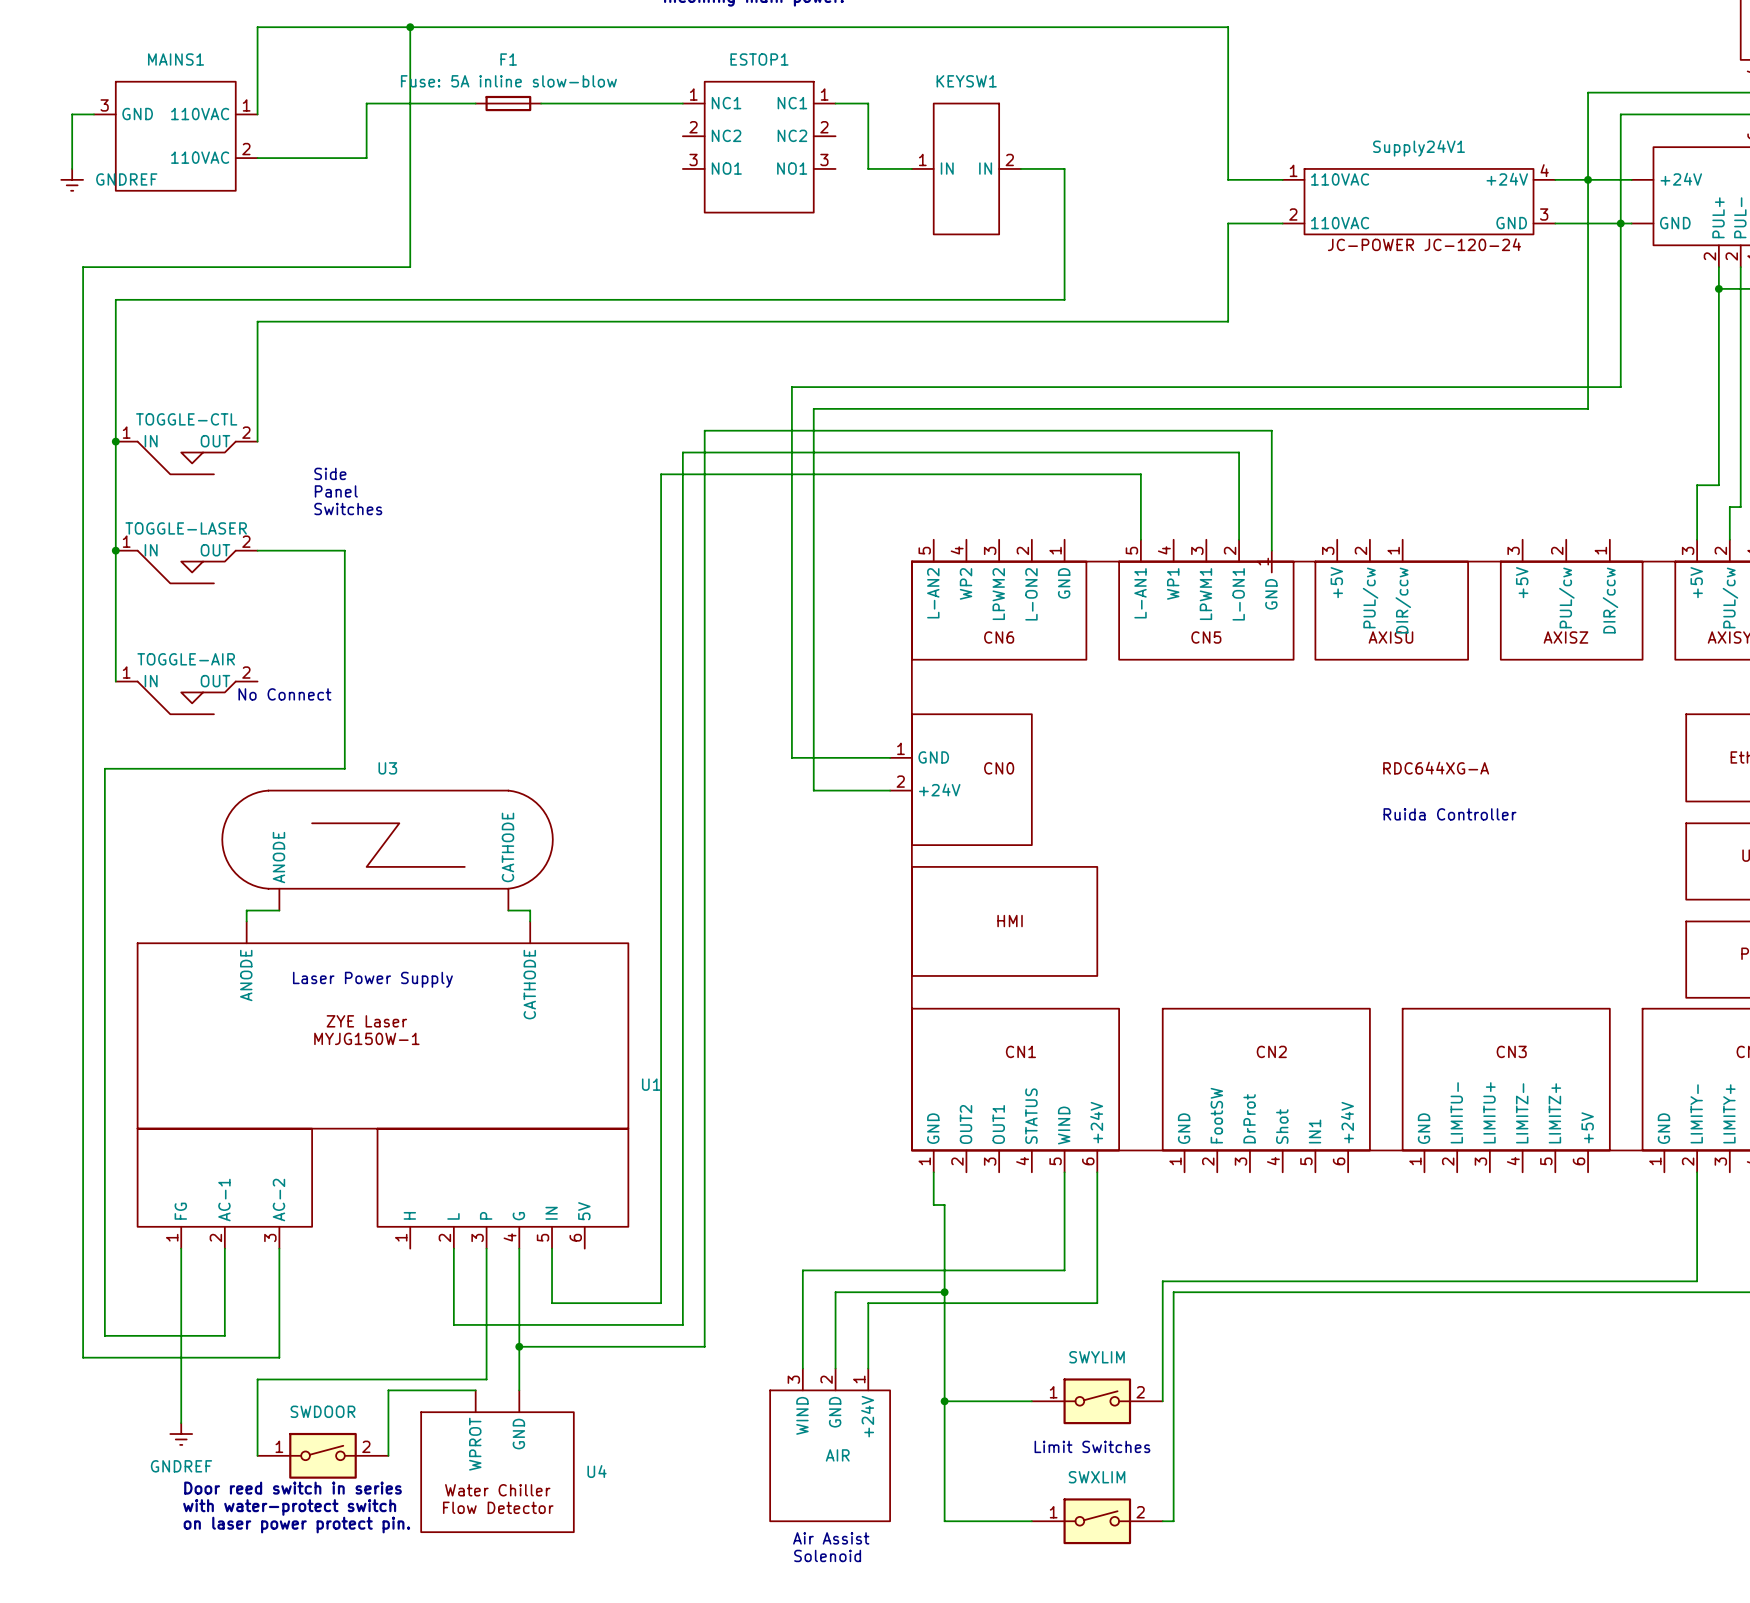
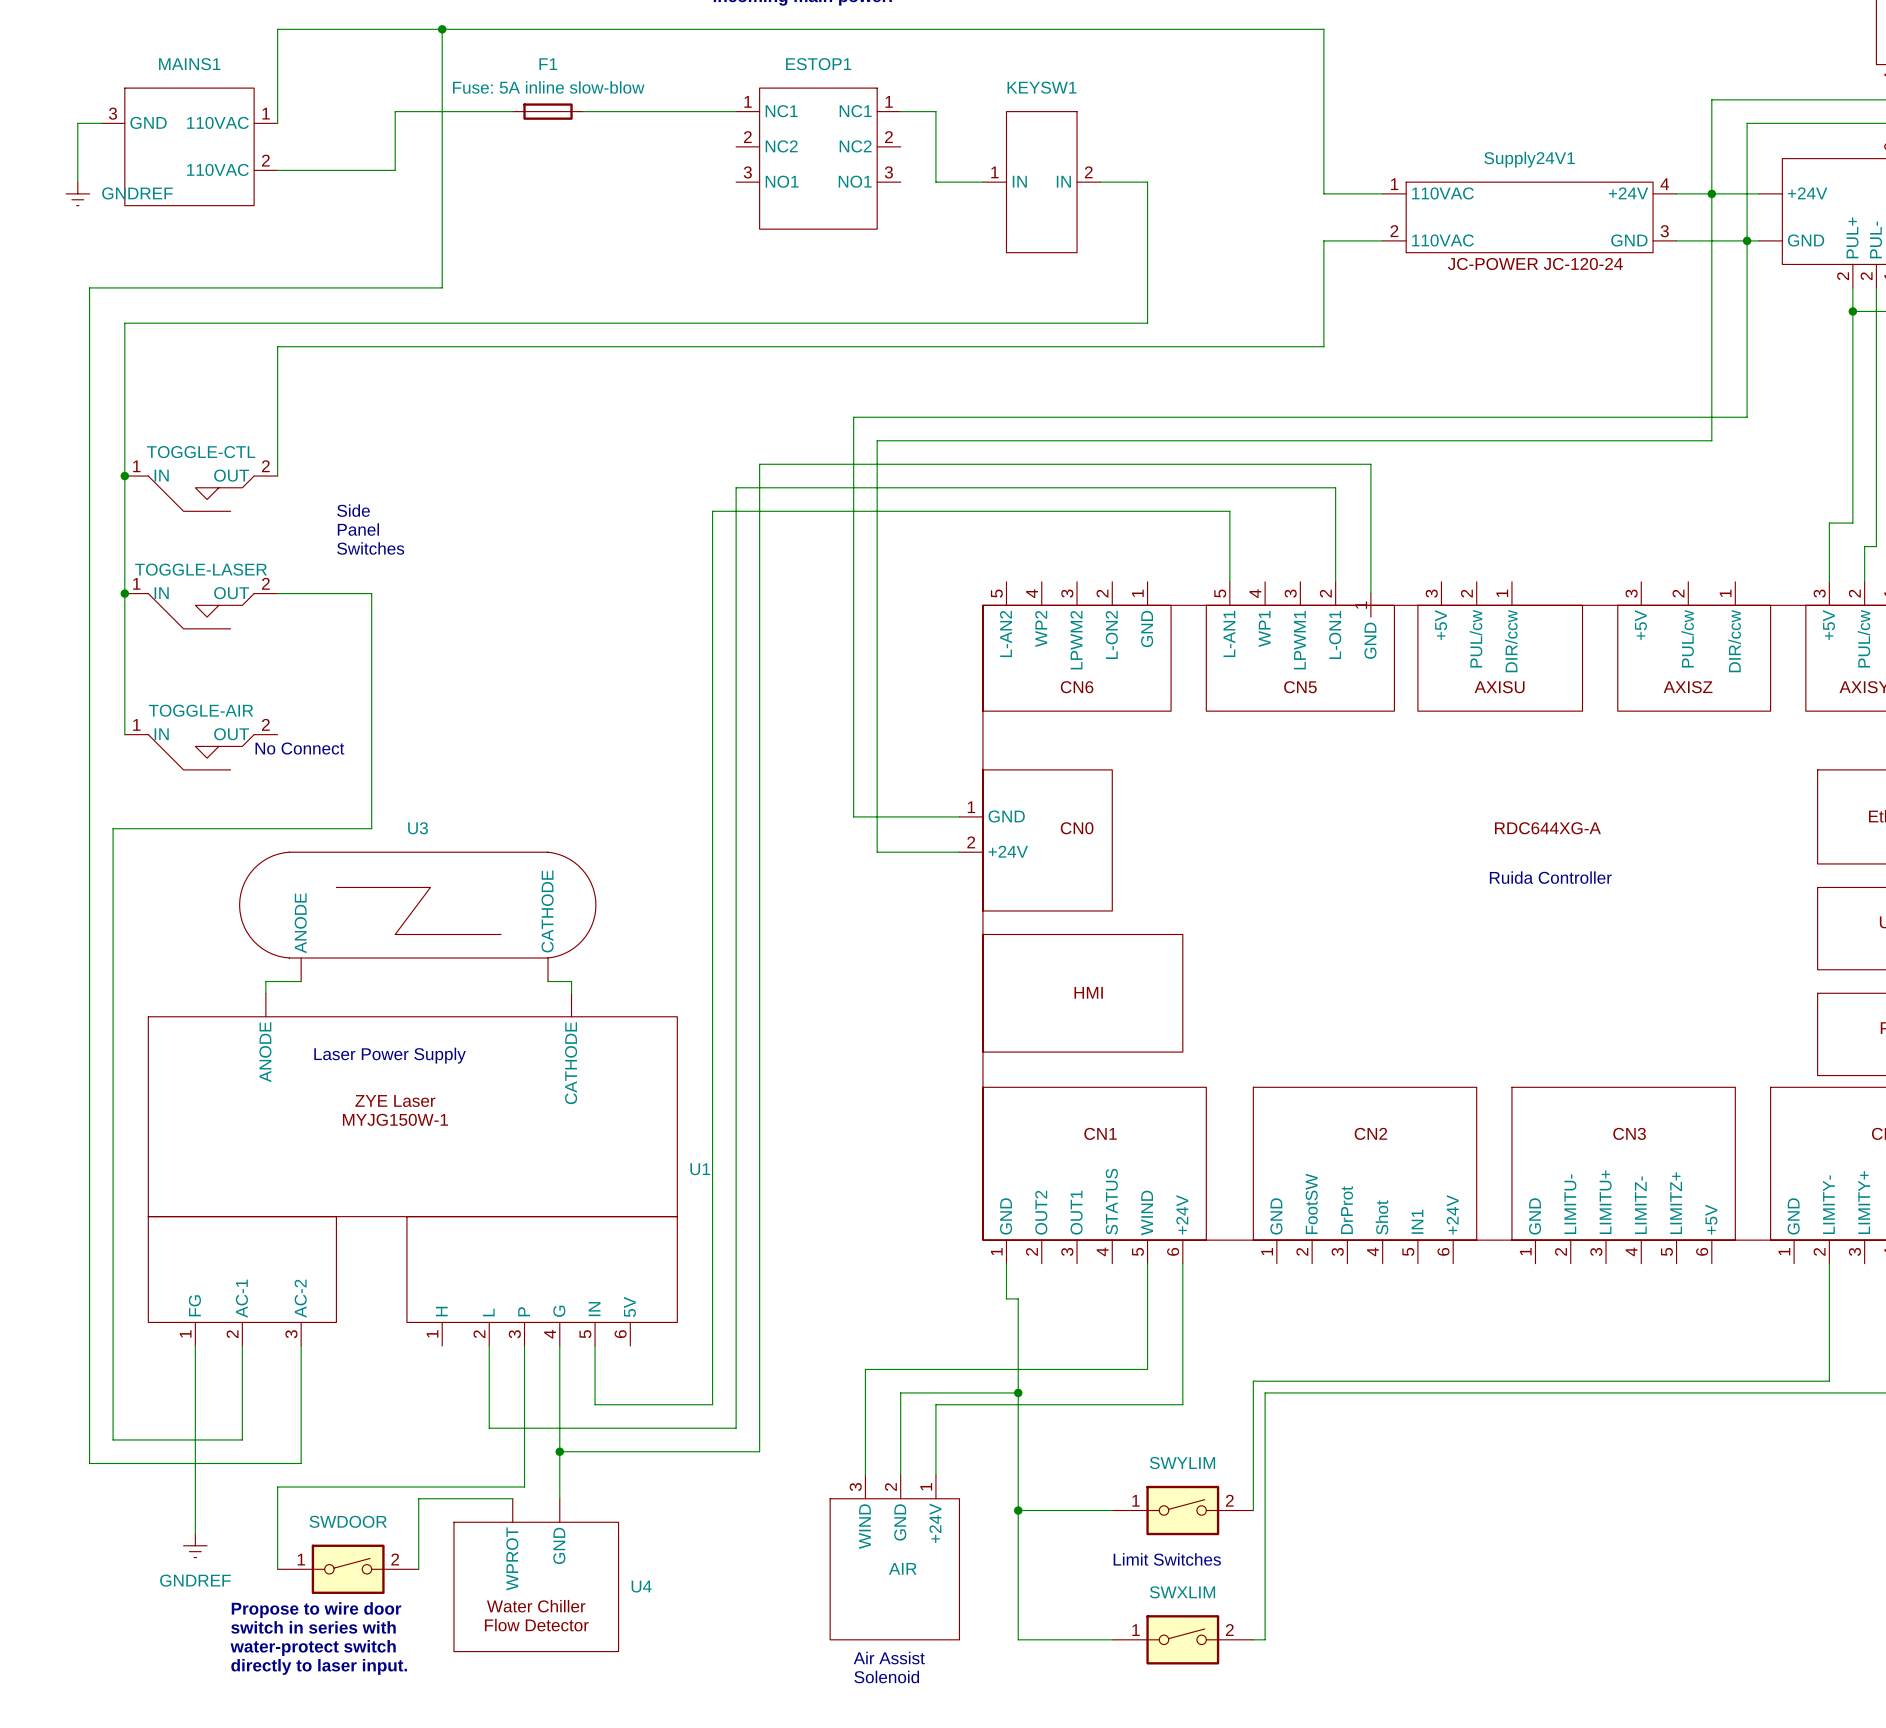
text: Door reed switch in series (293, 1488) -> switch in series with (313, 1627)
text: none -> Propose to wire door (316, 1610)
text: with water-protect switch (289, 1507) -> water-protect switch (313, 1647)
text: on laser power protect pin. (296, 1525) -> none
text: none -> directly to laser input. (319, 1666)

